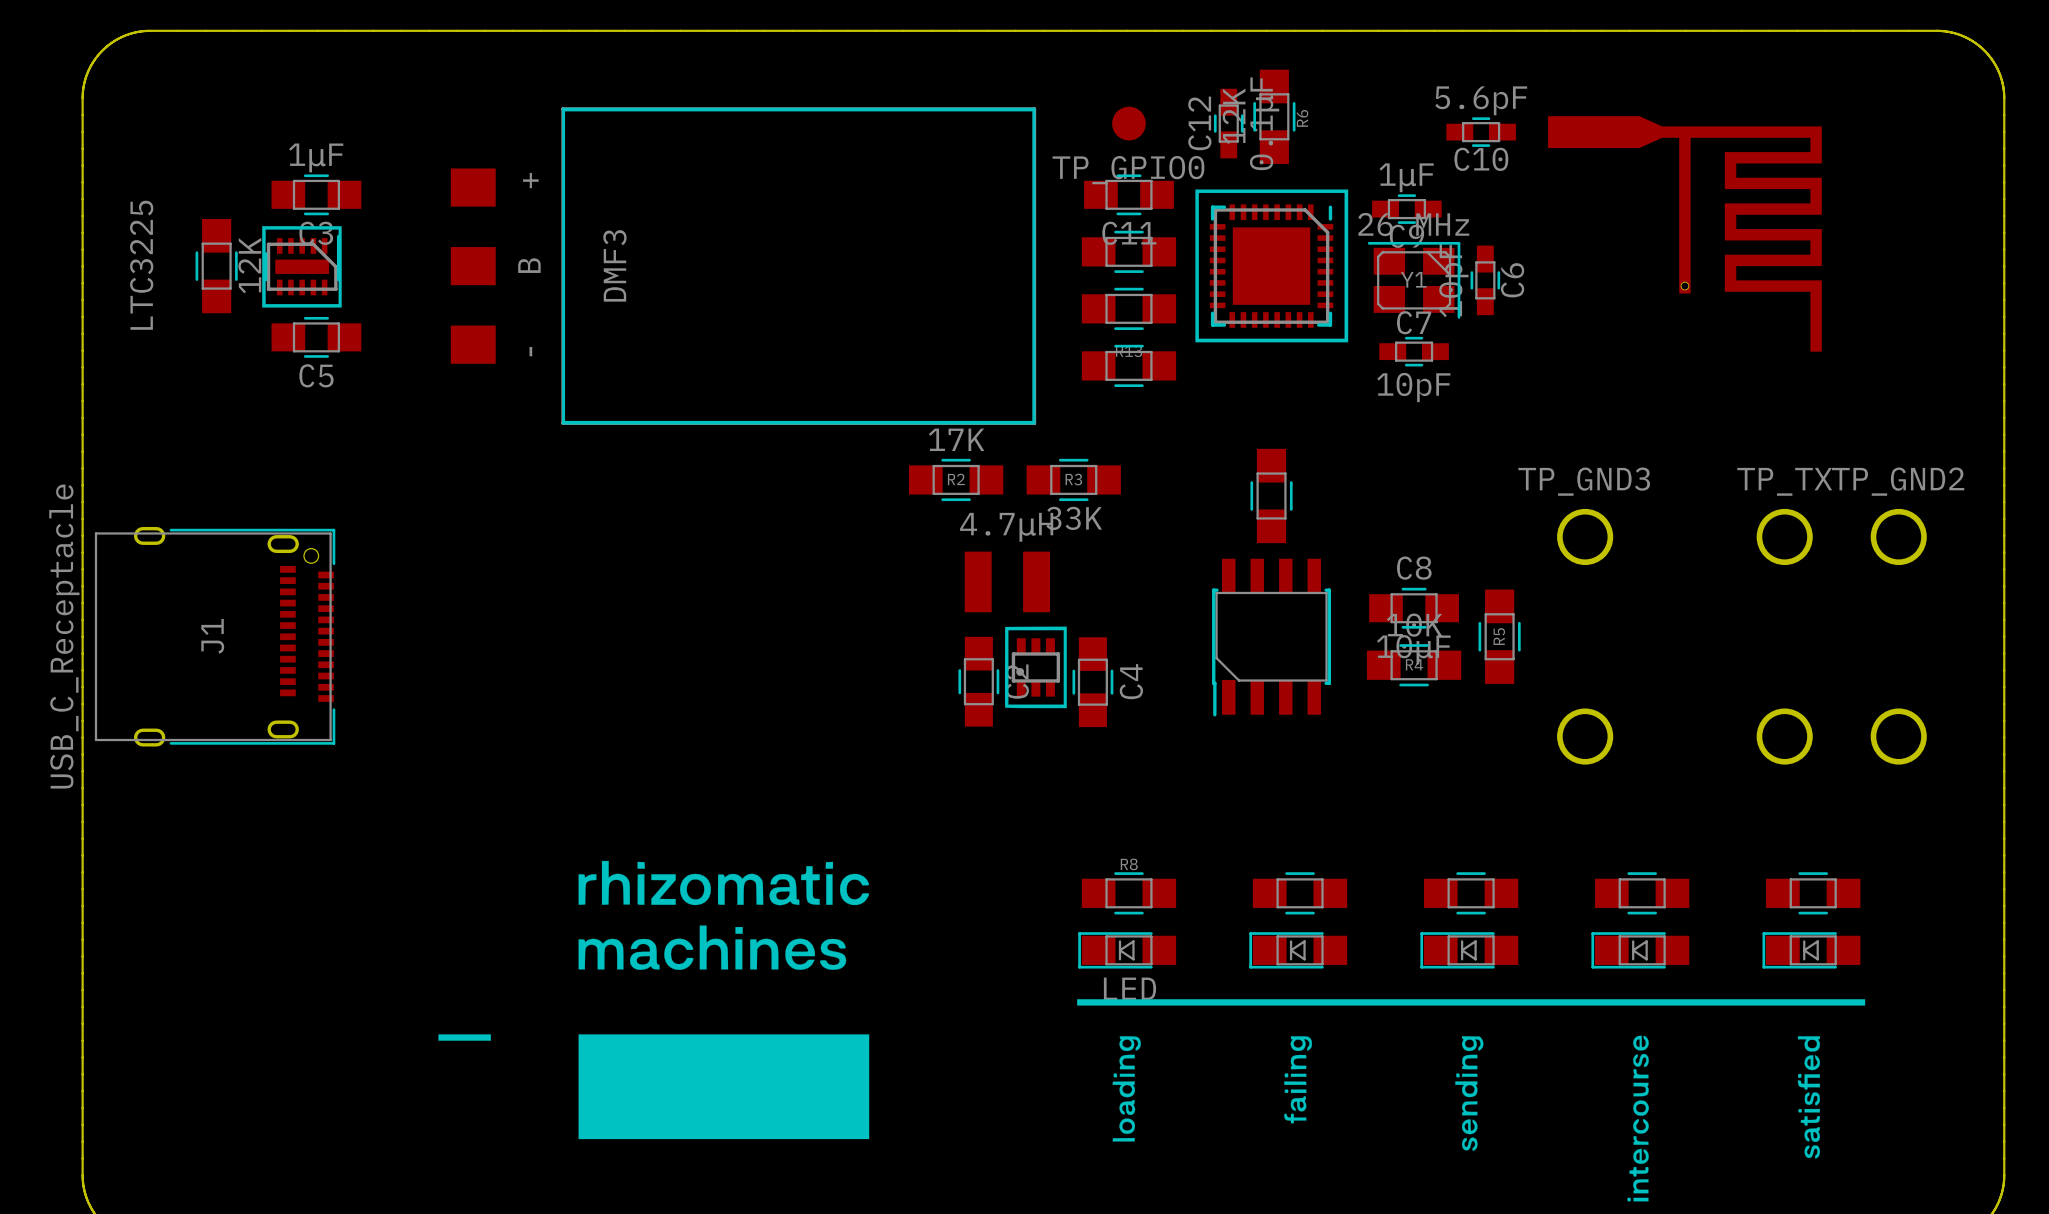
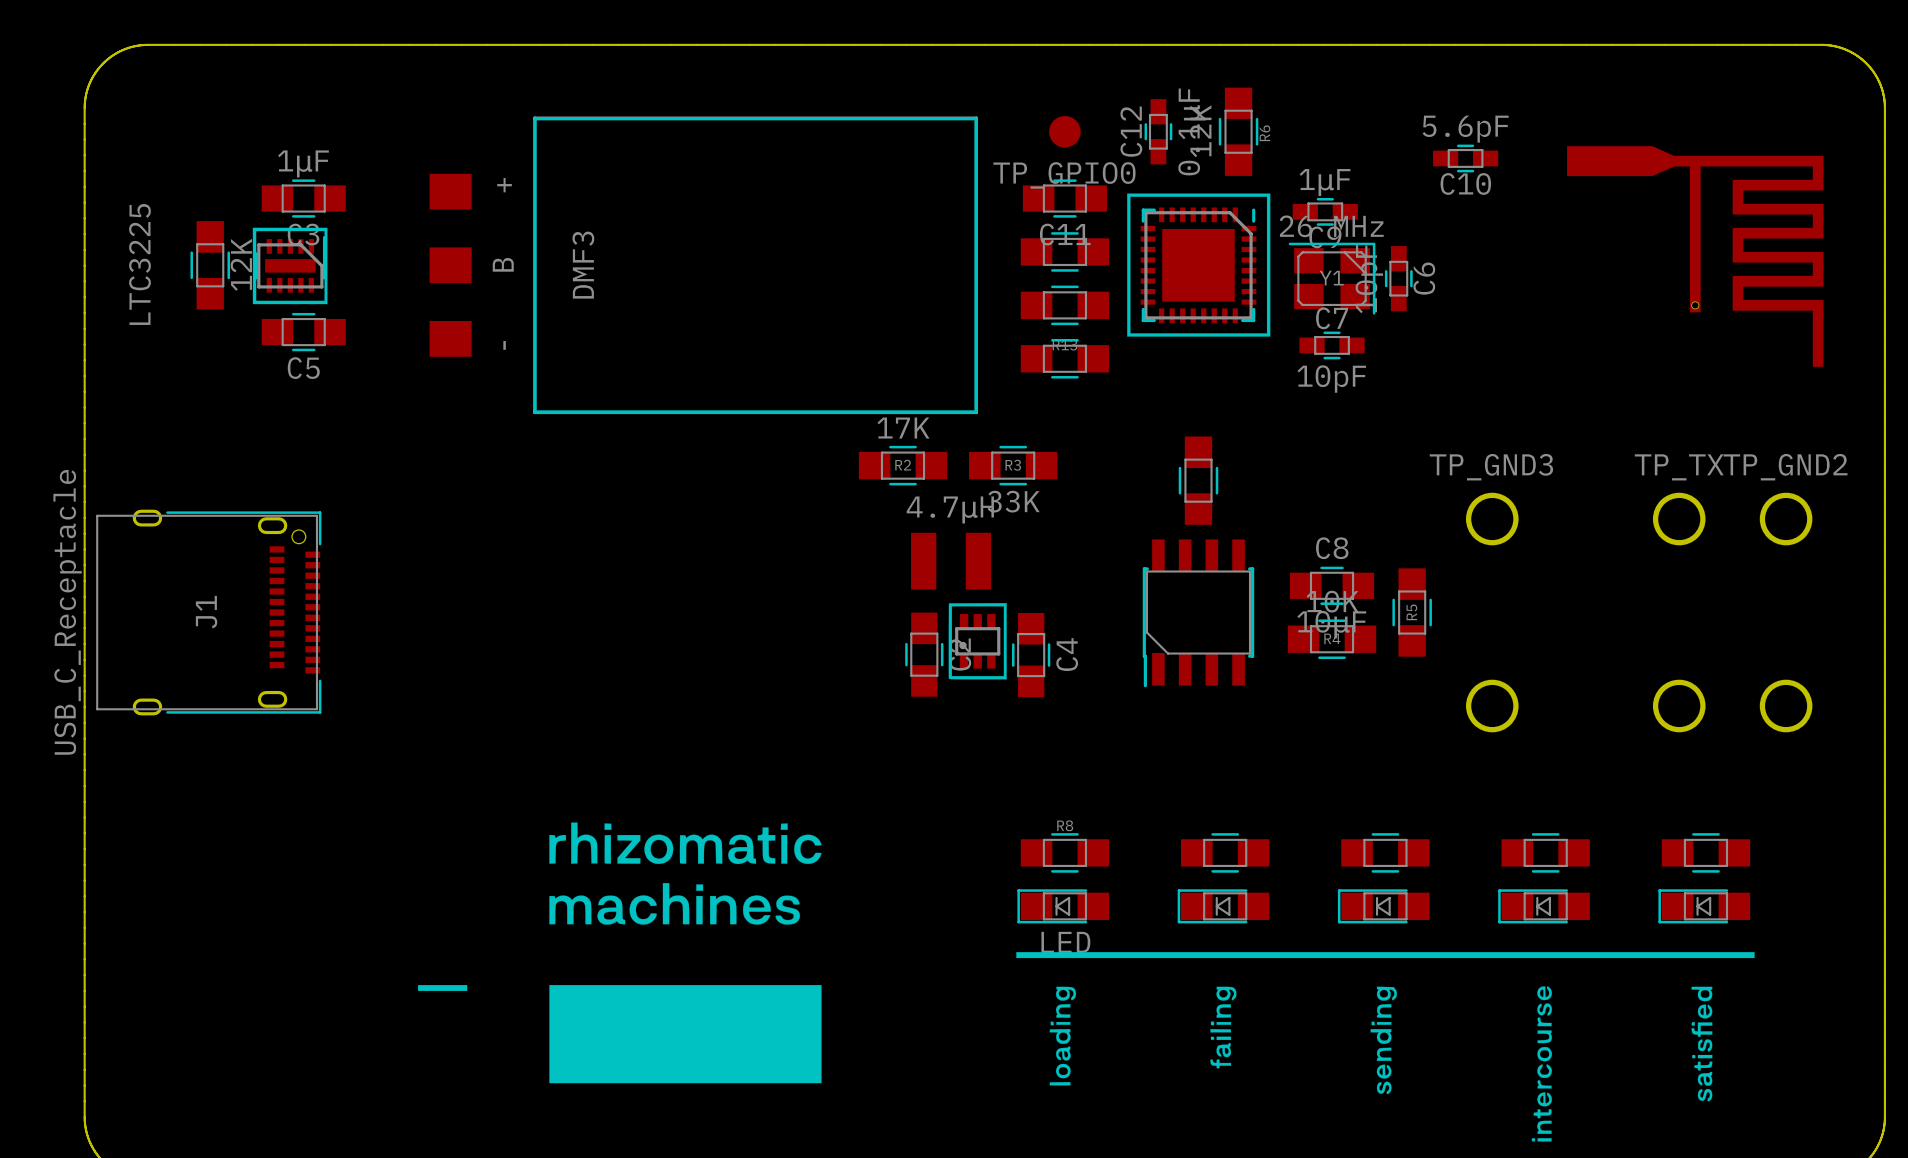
R6 position: (1274, 116) -> (1238, 131)
C10 position: (1481, 132) -> (1465, 158)
part position: (1684, 233) -> (1695, 256)

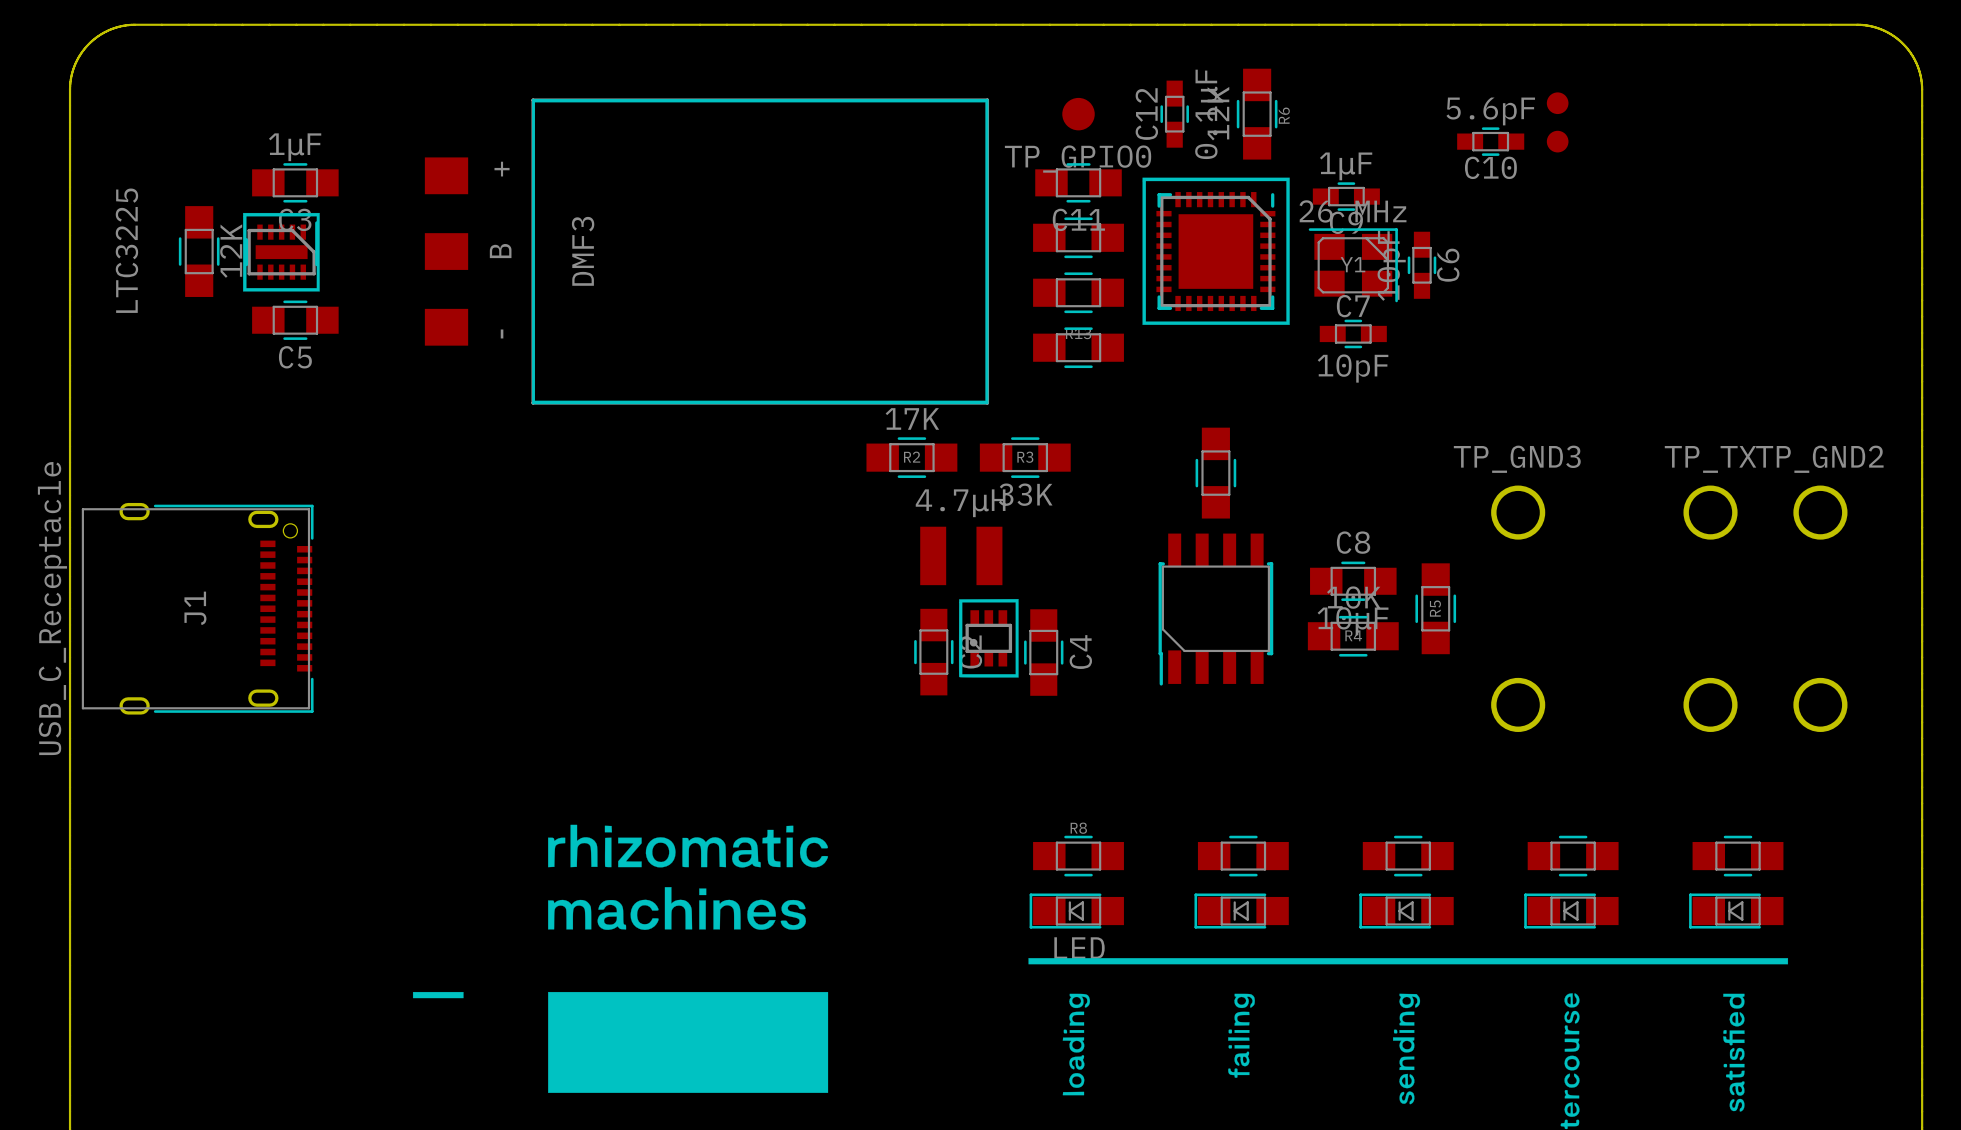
part: none -> (1557, 122)
part: (1695, 256) -> none

